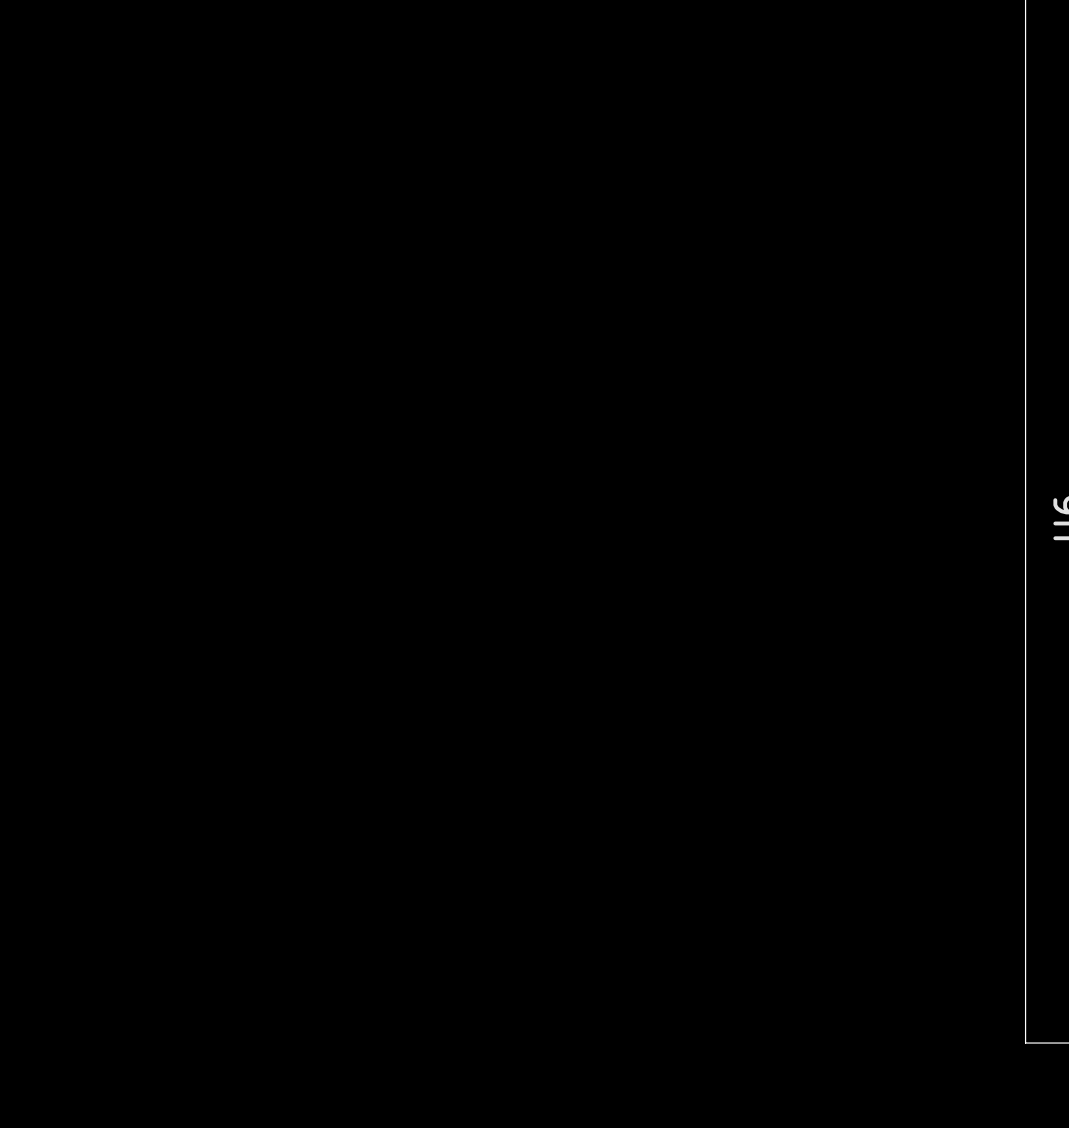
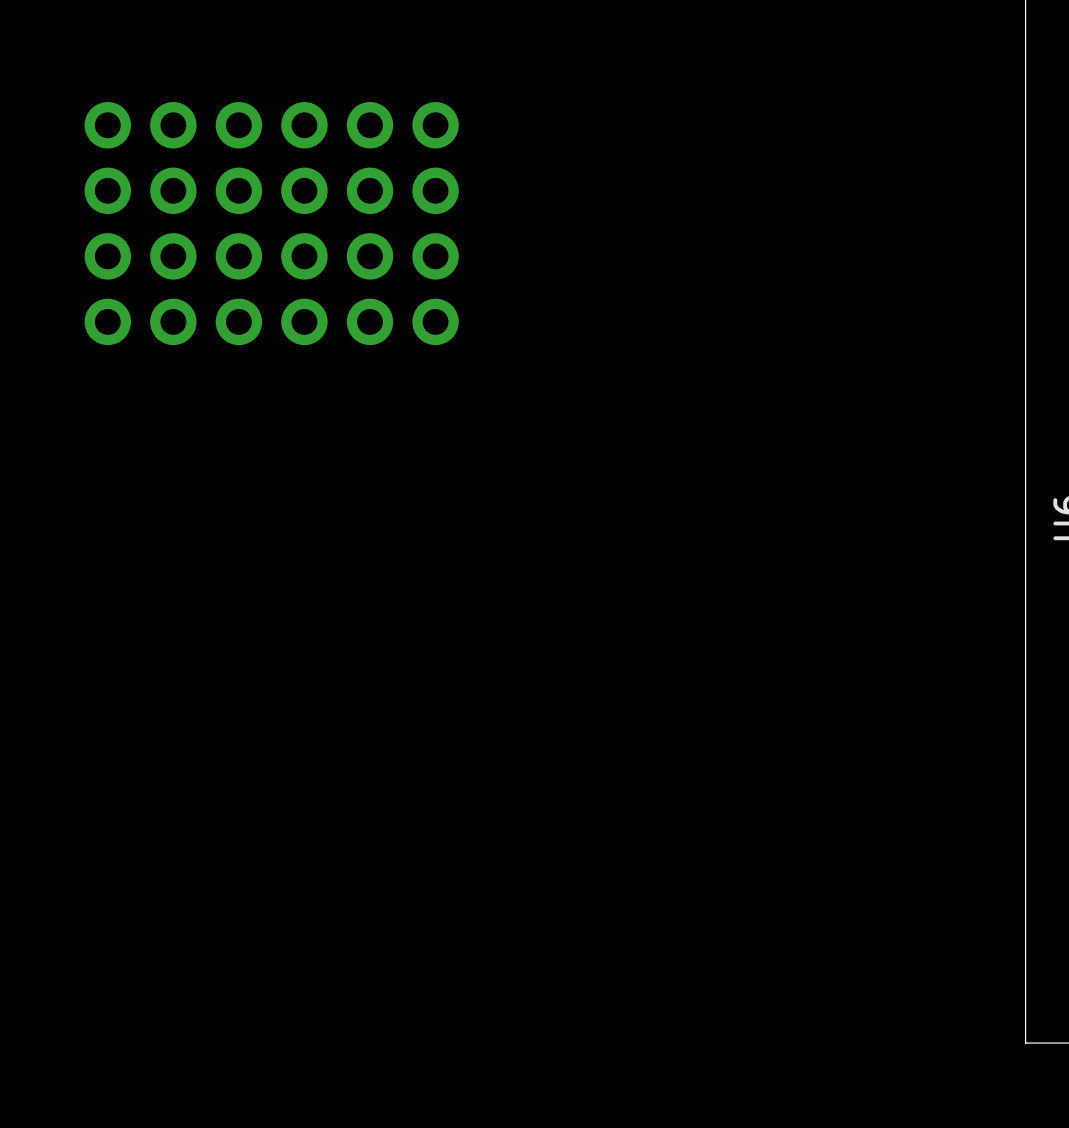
part: none -> (107, 125)
part: none -> (173, 125)
part: none -> (238, 125)
part: none -> (304, 125)
part: none -> (370, 125)
part: none -> (435, 125)
part: none -> (107, 190)
part: none -> (173, 190)
part: none -> (238, 190)
part: none -> (304, 190)
part: none -> (370, 190)
part: none -> (435, 190)
part: none -> (107, 256)
part: none -> (173, 256)
part: none -> (238, 256)
part: none -> (304, 256)
part: none -> (370, 256)
part: none -> (435, 256)
part: none -> (107, 321)
part: none -> (173, 321)
part: none -> (238, 321)
part: none -> (304, 321)
part: none -> (370, 321)
part: none -> (435, 321)

